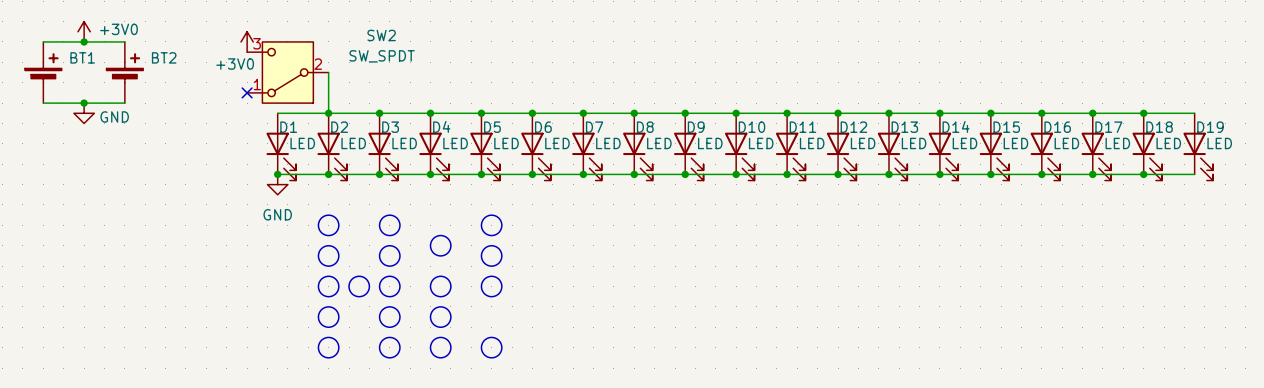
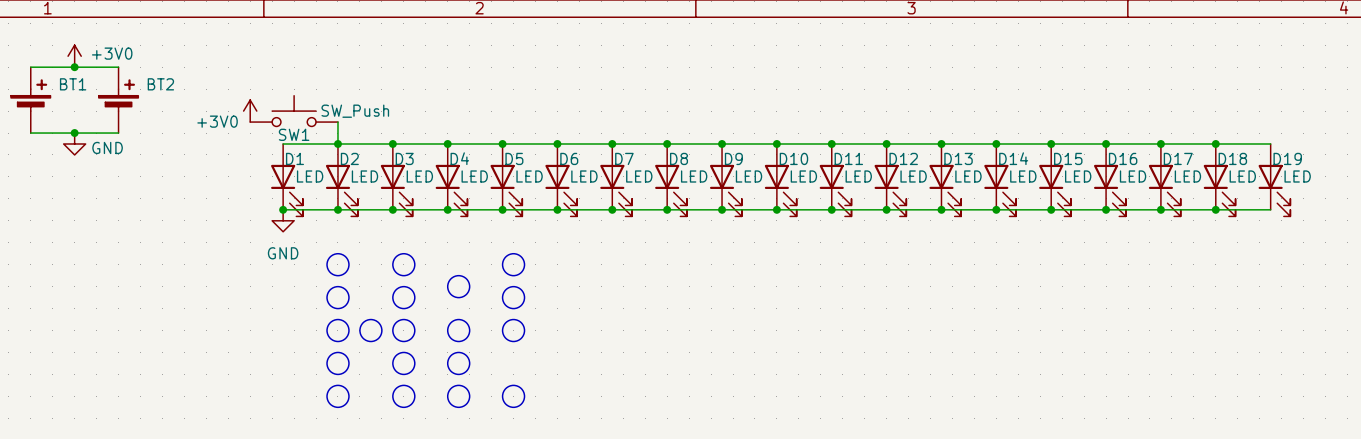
power symbol position: +3V0 (247, 41) -> +3V0 (250, 111)
power symbol text position: +3V0 (235, 64) -> +3V0 (217, 121)
SW2: SW_SPDT (287, 72) -> none
wire: (328, 72) (328, 92) -> none
SW1: none -> SW_Push (294, 111)
no-connect mark: (247, 92) -> none

